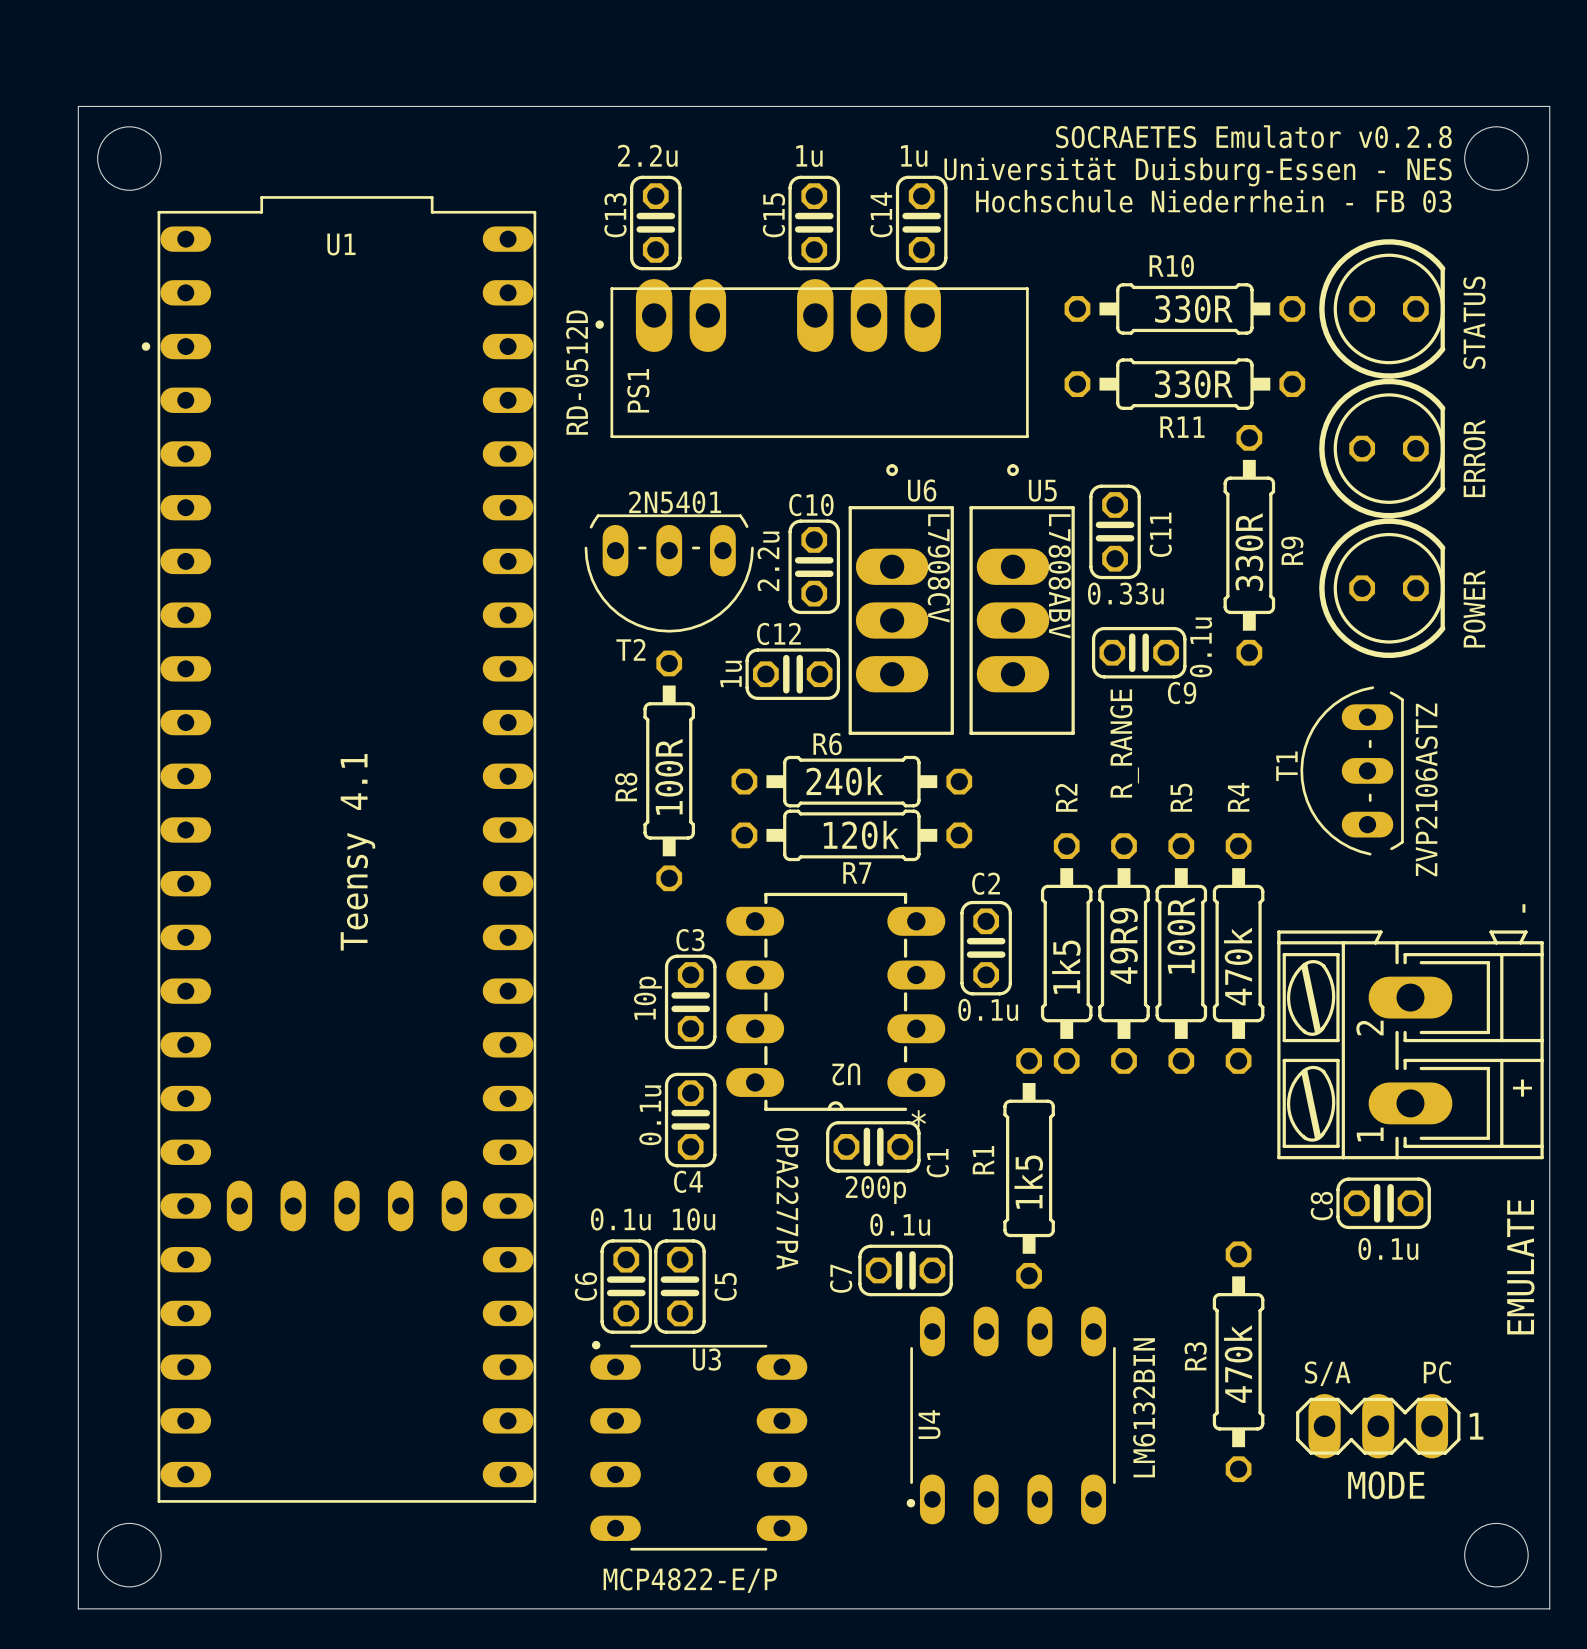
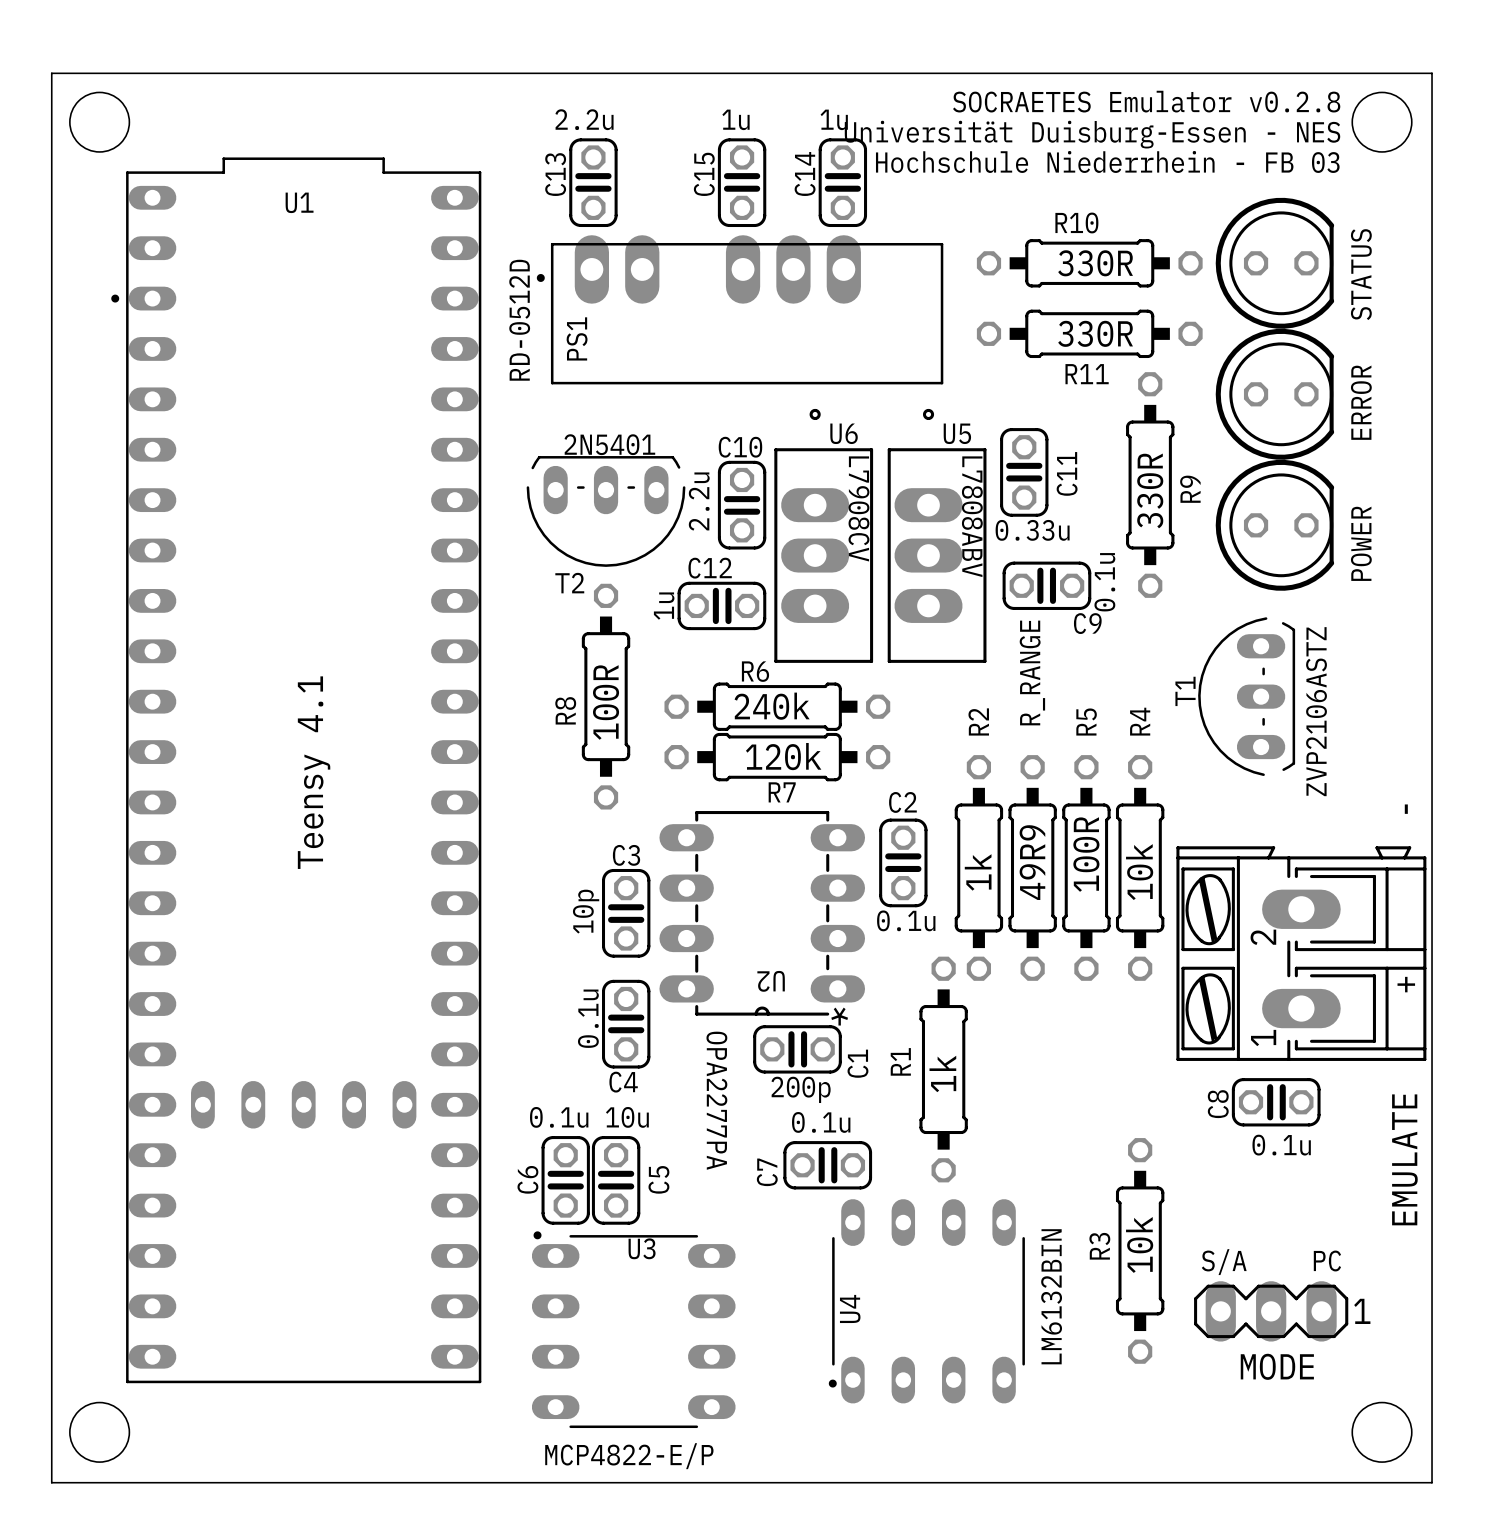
R4 value: 470k (1238, 966) -> 10k (1139, 872)
R2 value: 1k5 (1066, 967) -> 1k (978, 872)
R1 value: 1k5 (1028, 1182) -> 1k (942, 1073)
R3 value: 470k (1238, 1364) -> 10k (1139, 1244)

